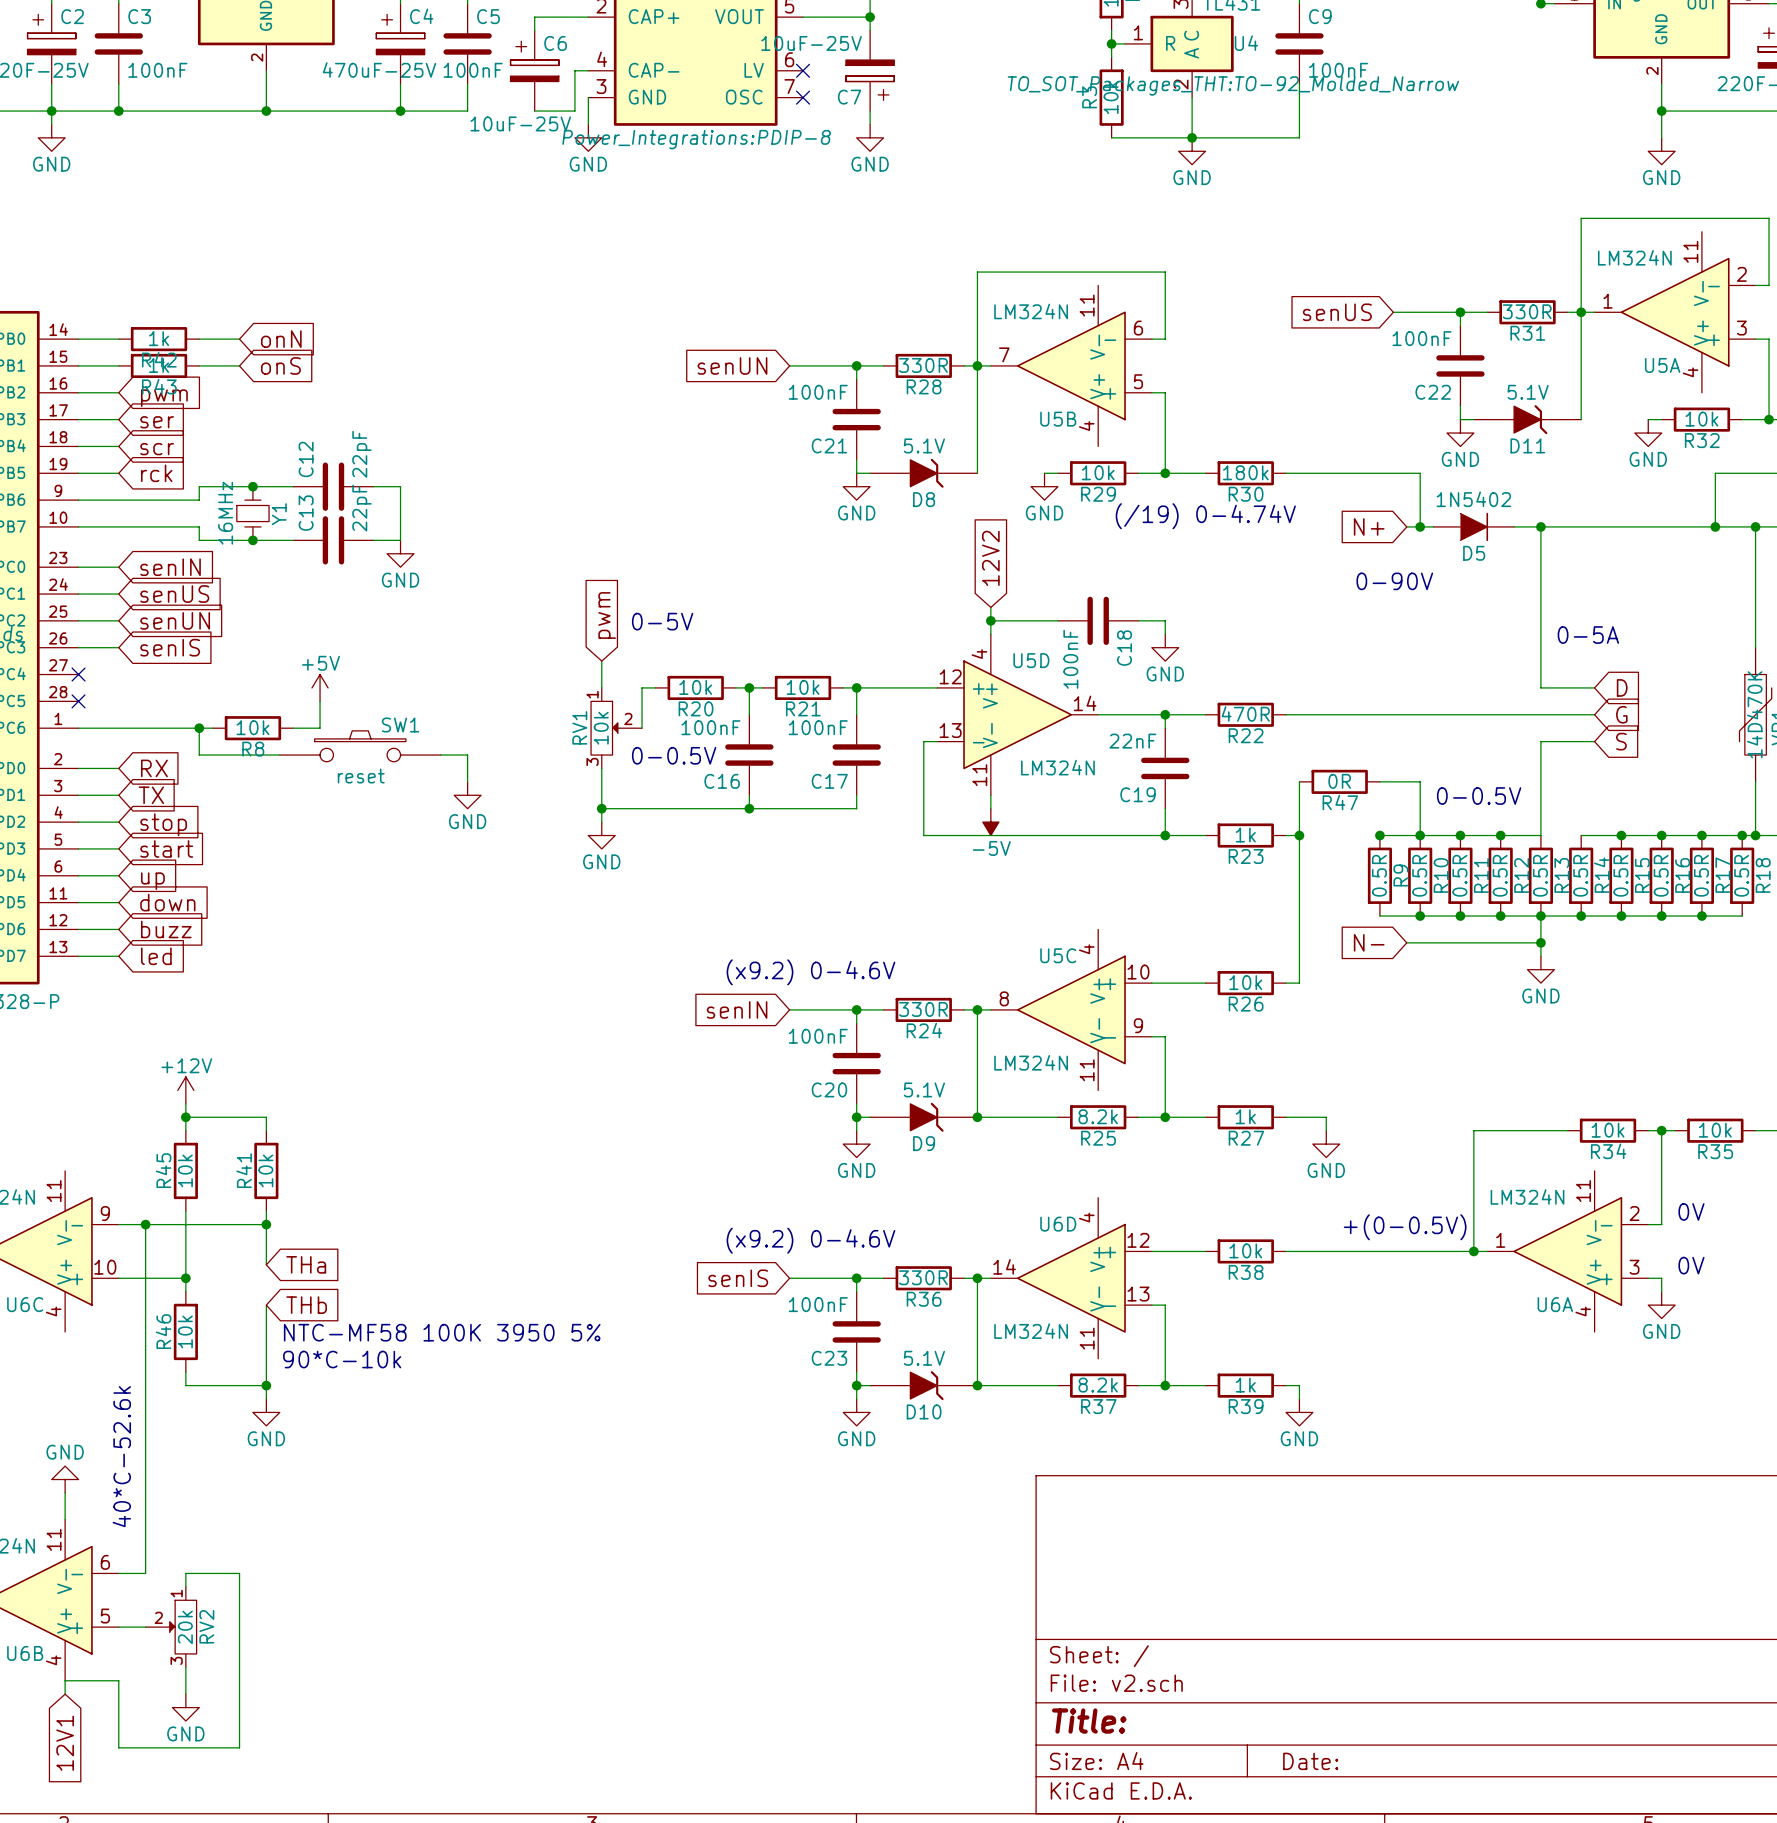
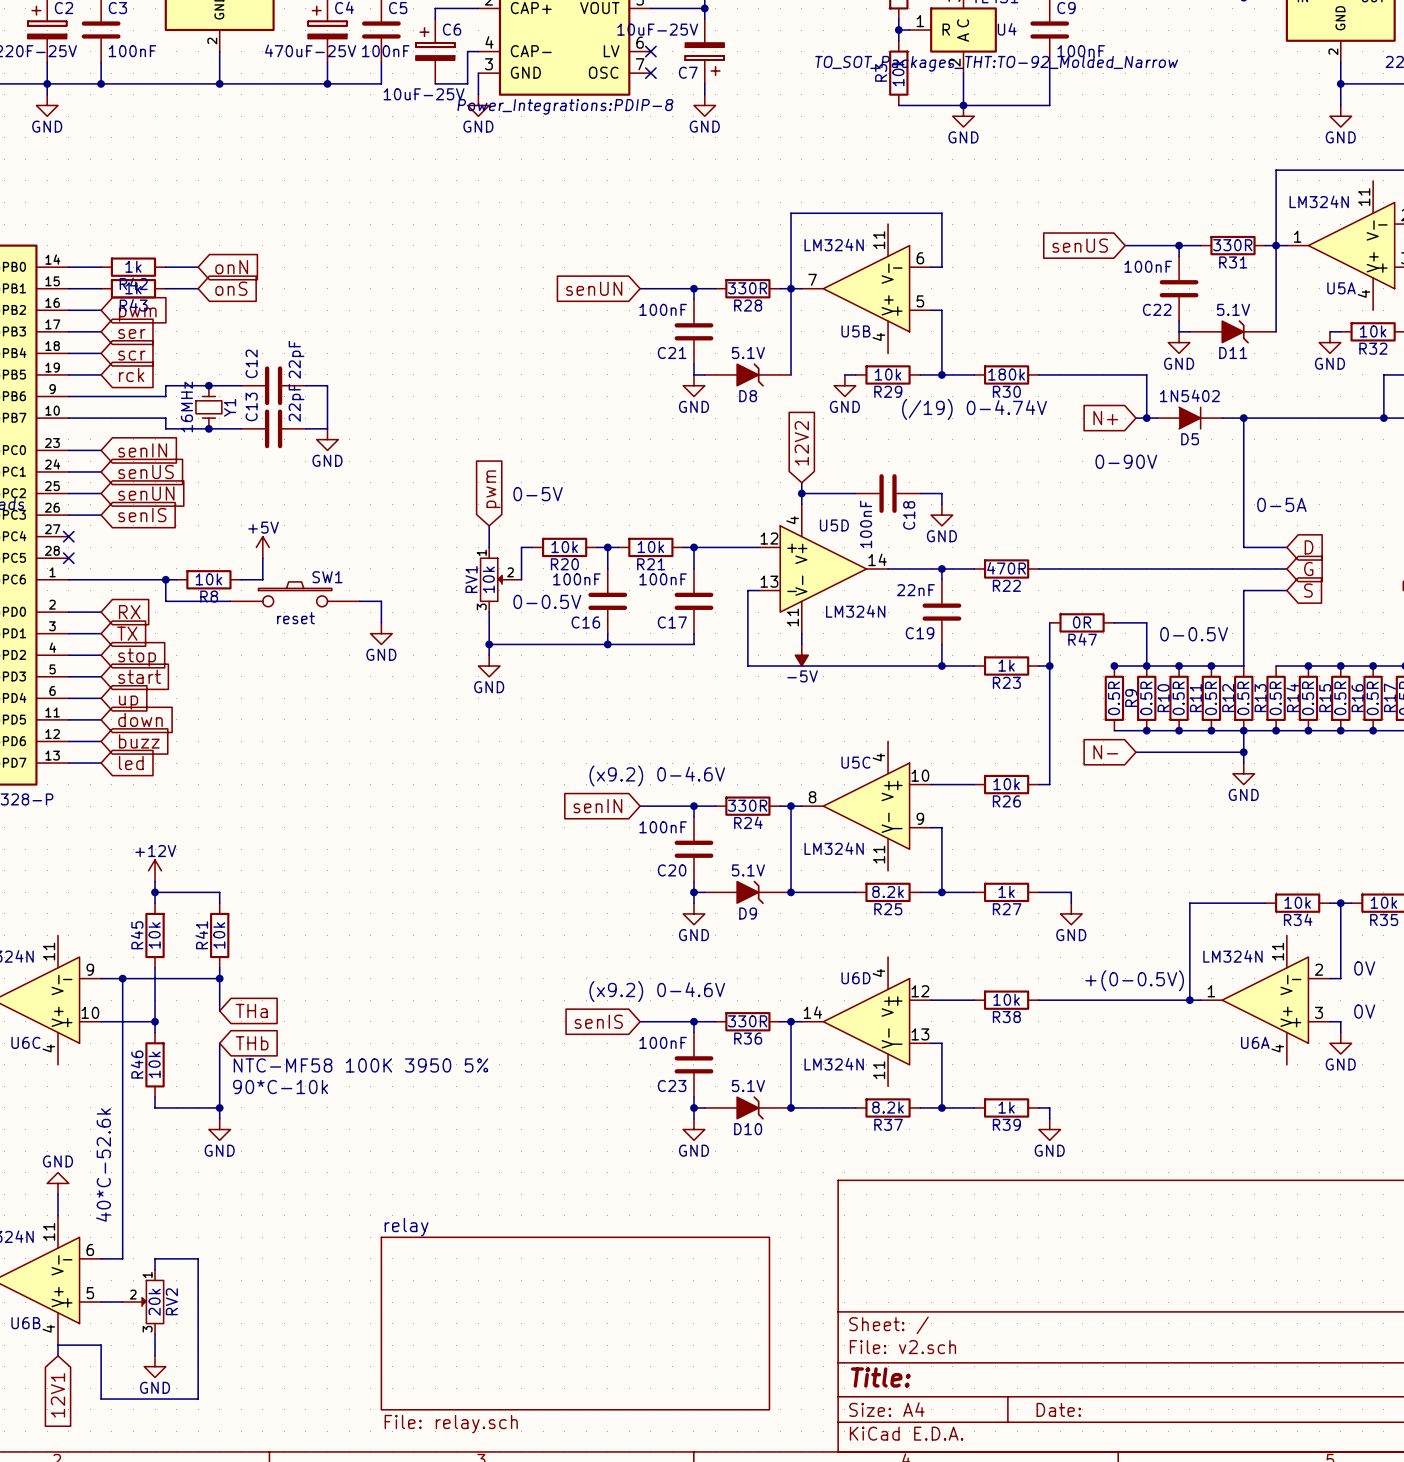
sheet relay: none -> File: relay.sch (575, 1323)

